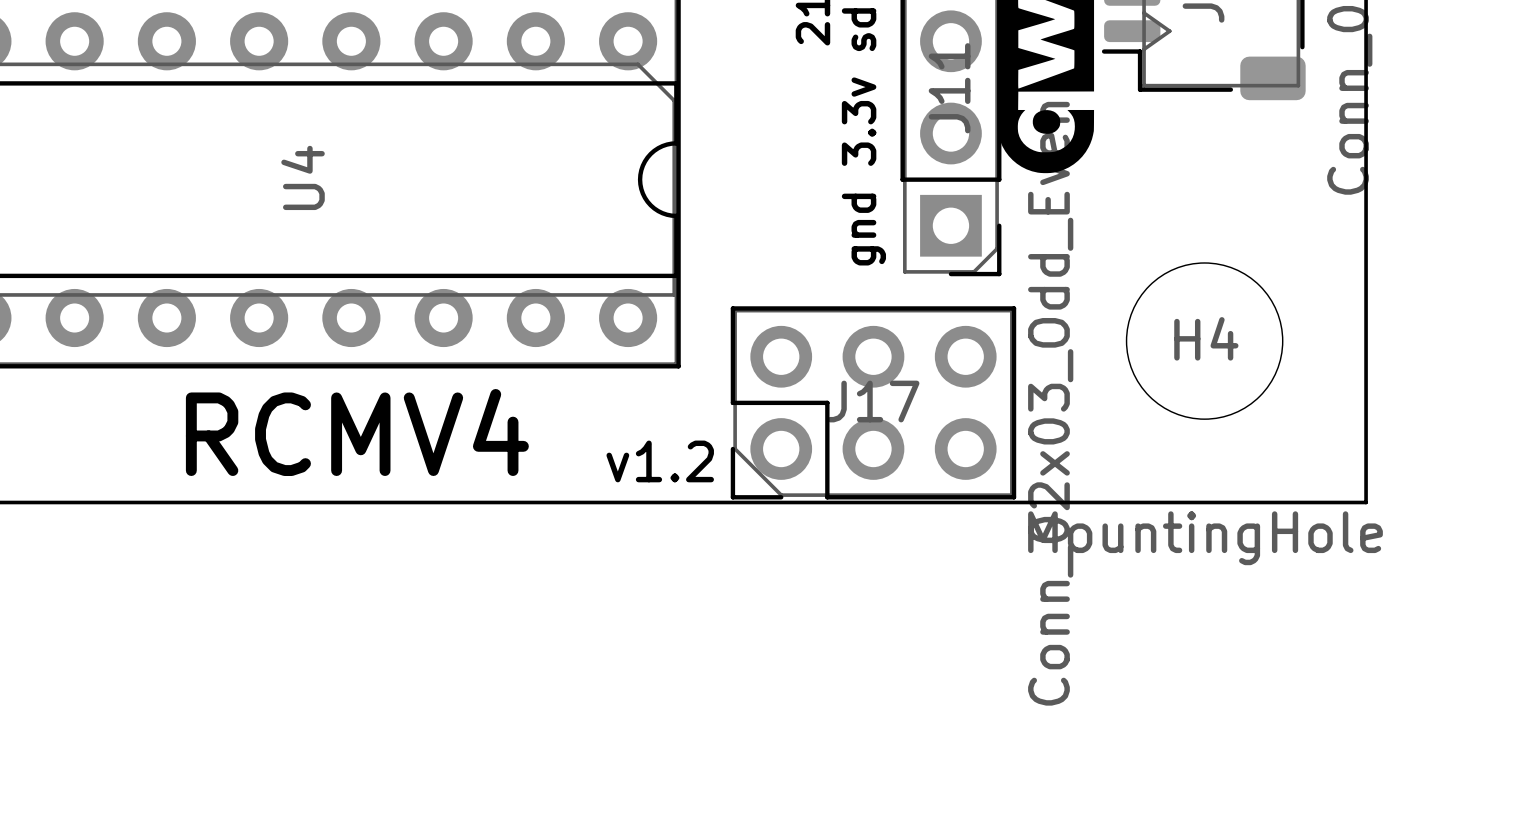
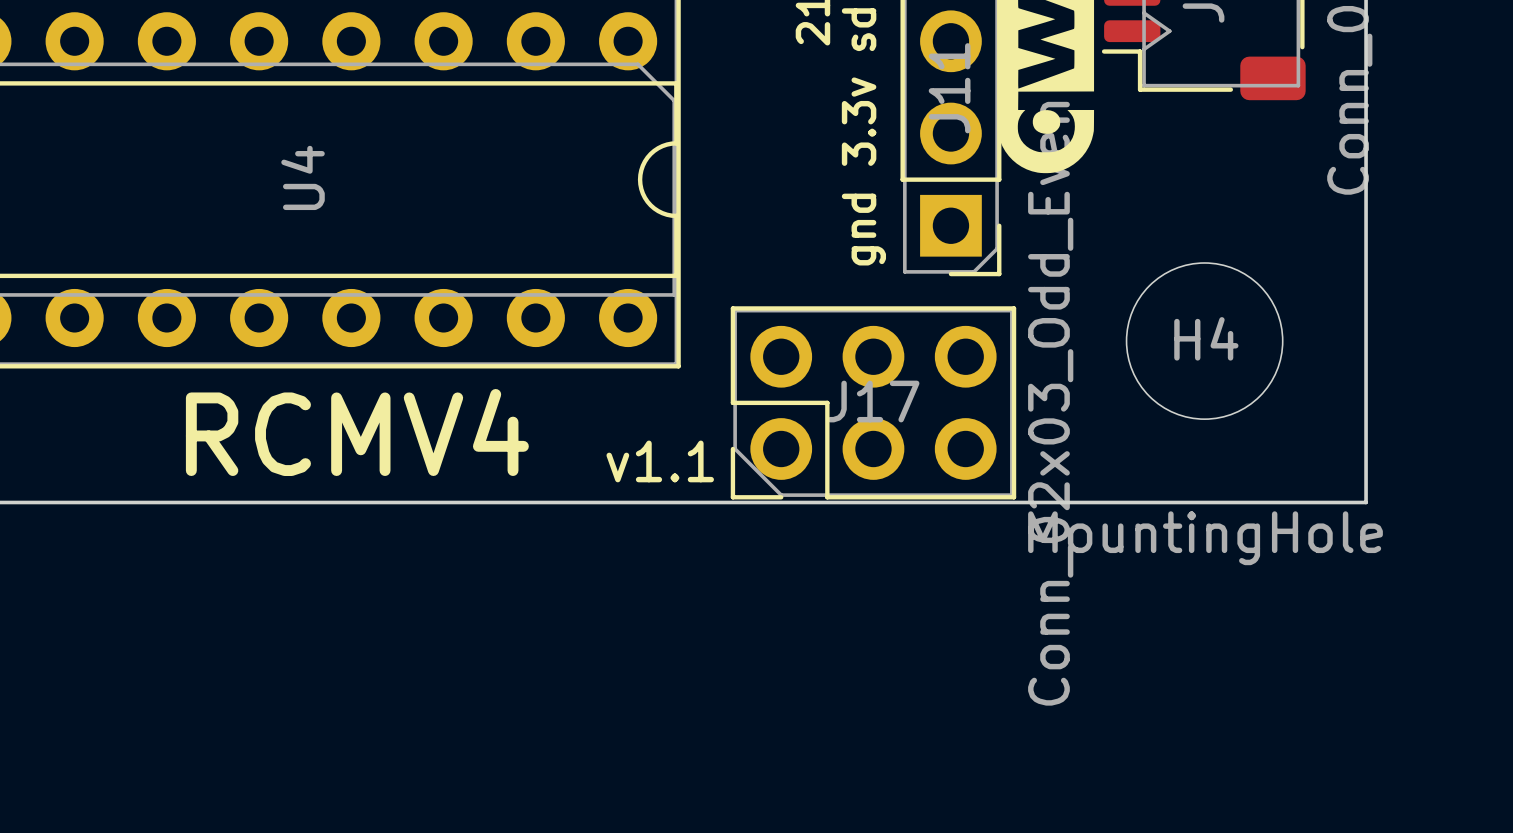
text: v1.2 (660, 461) -> v1.1 (660, 461)

